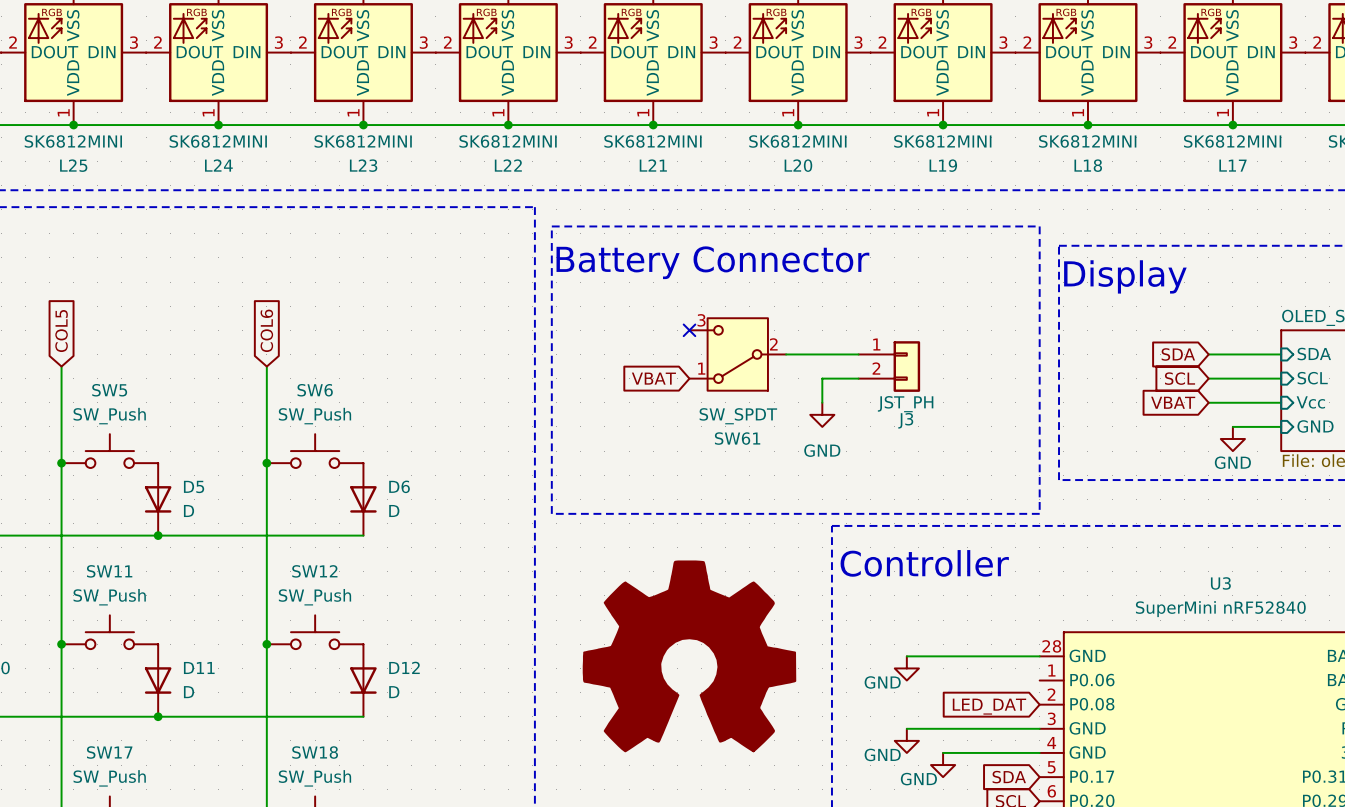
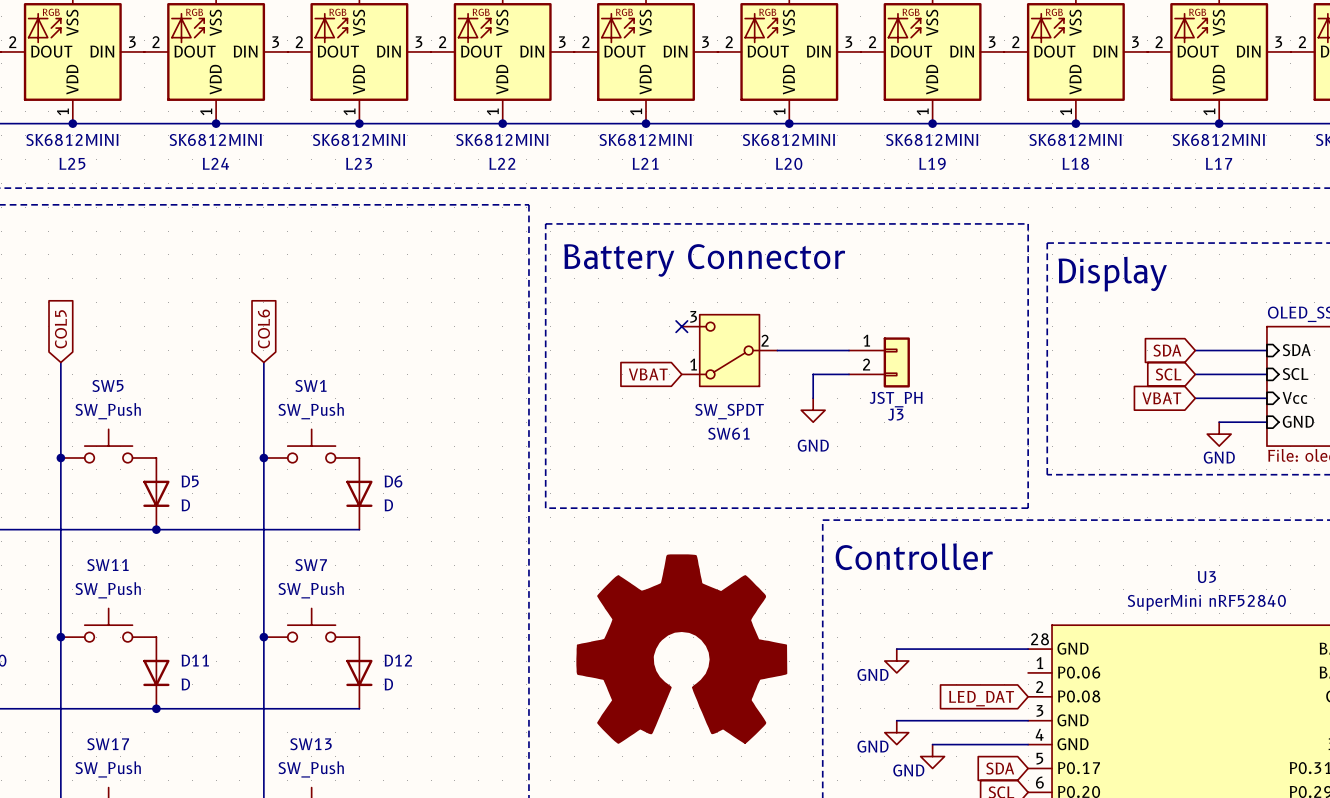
SW6 name: SW6 (315, 390) -> SW1 (310, 385)
SW12 name: SW12 (314, 571) -> SW7 (311, 565)
SW18 name: SW18 (315, 752) -> SW13 (311, 744)

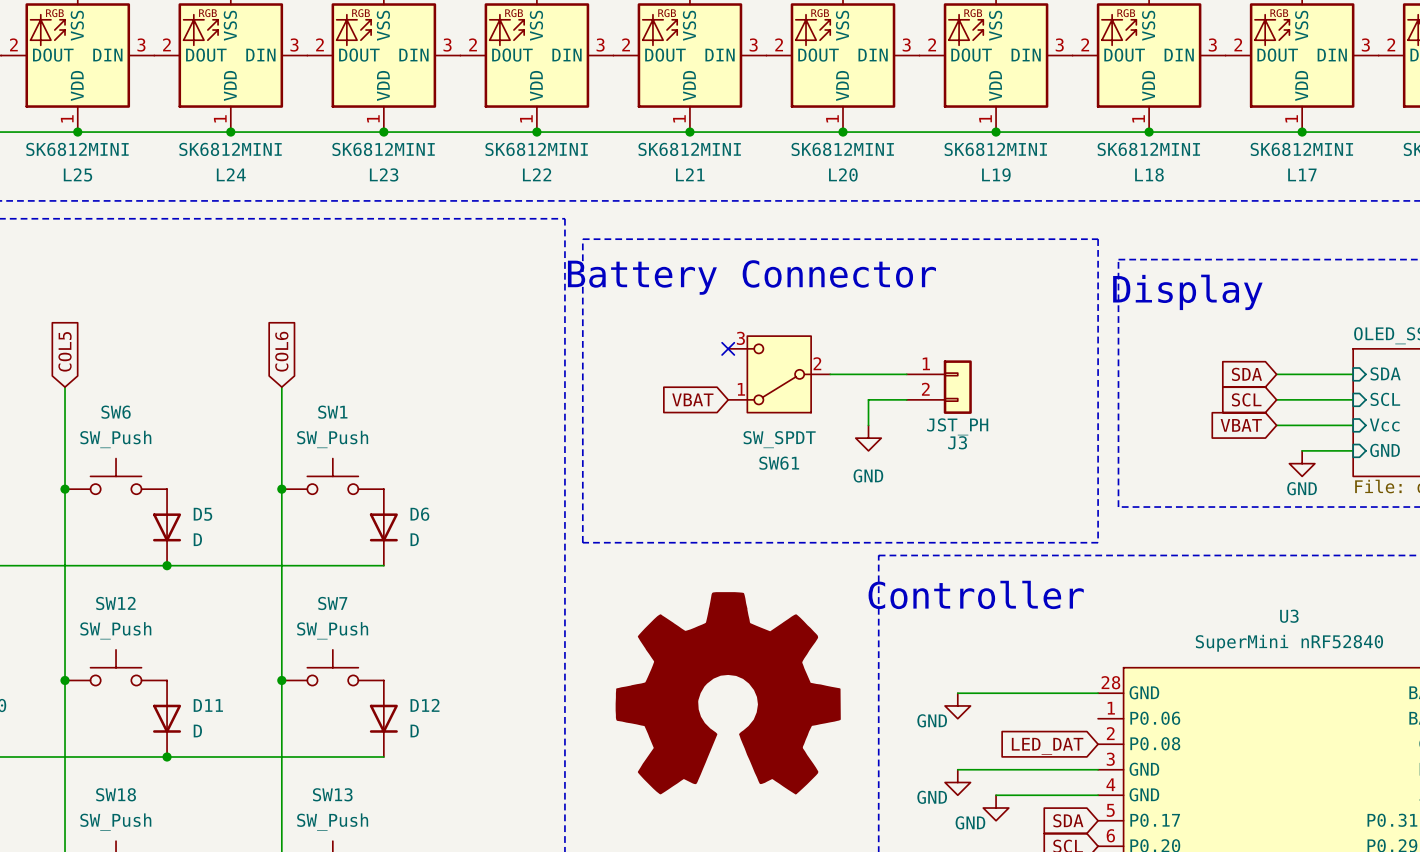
SW5 name: SW5 (107, 385) -> SW6 (116, 412)
SW11 name: SW11 (107, 565) -> SW12 (115, 603)
SW17 name: SW17 (108, 744) -> SW18 (116, 794)

